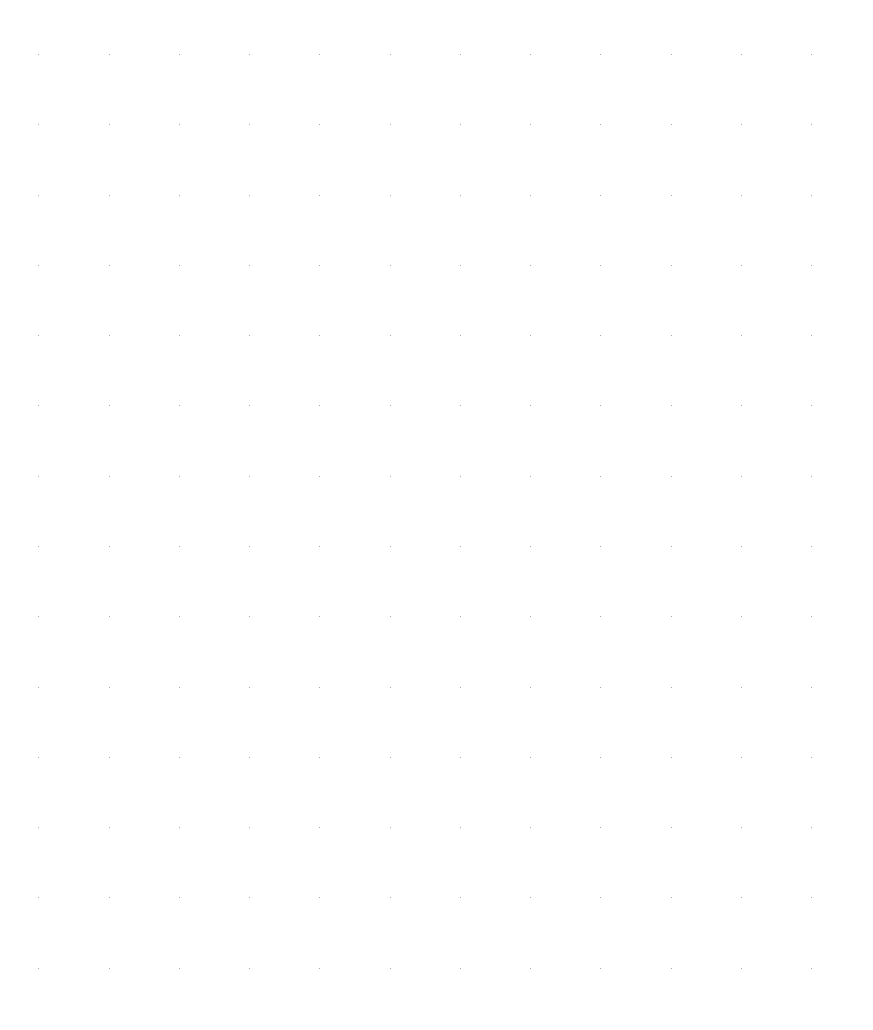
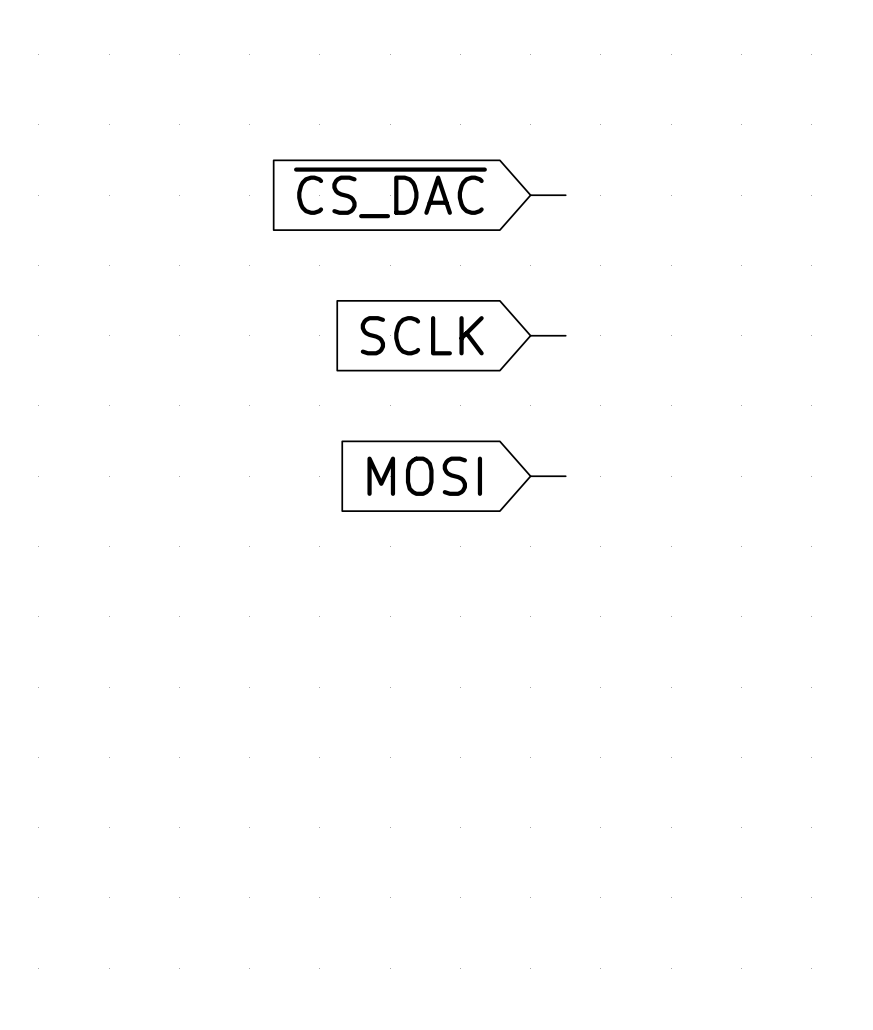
global label: none -> ~{CS_DAC} (390, 192)
wire: none -> (530, 195) (565, 195)
global label: none -> SCLK (422, 335)
wire: none -> (530, 335) (565, 335)
global label: none -> MOSI (424, 476)
wire: none -> (530, 476) (565, 476)

